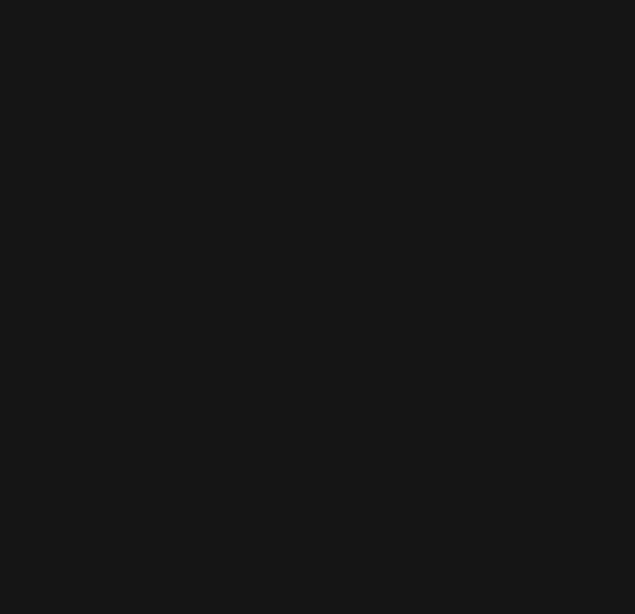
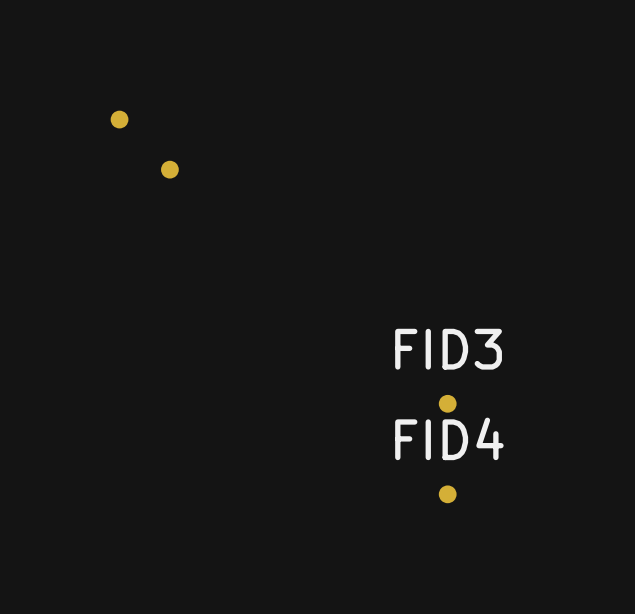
part: none -> (119, 119)
part: none -> (169, 169)
FID3: none -> (447, 403)
FID4: none -> (447, 494)

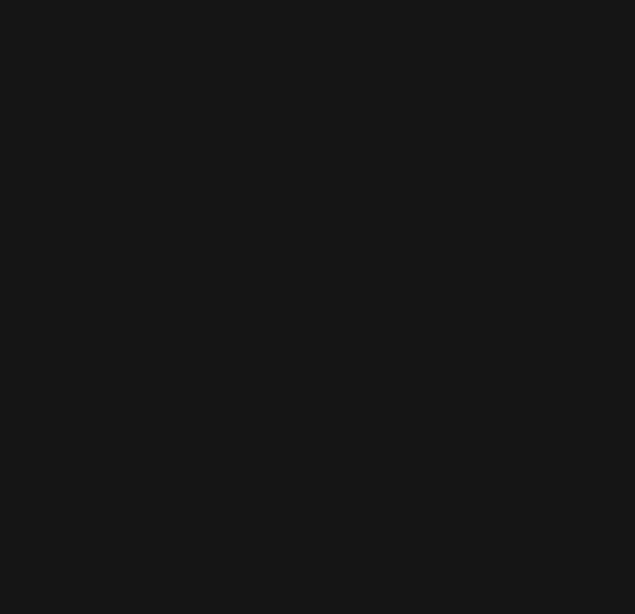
part: (119, 119) -> none
part: (169, 169) -> none
FID3: (447, 403) -> none
FID4: (447, 494) -> none

